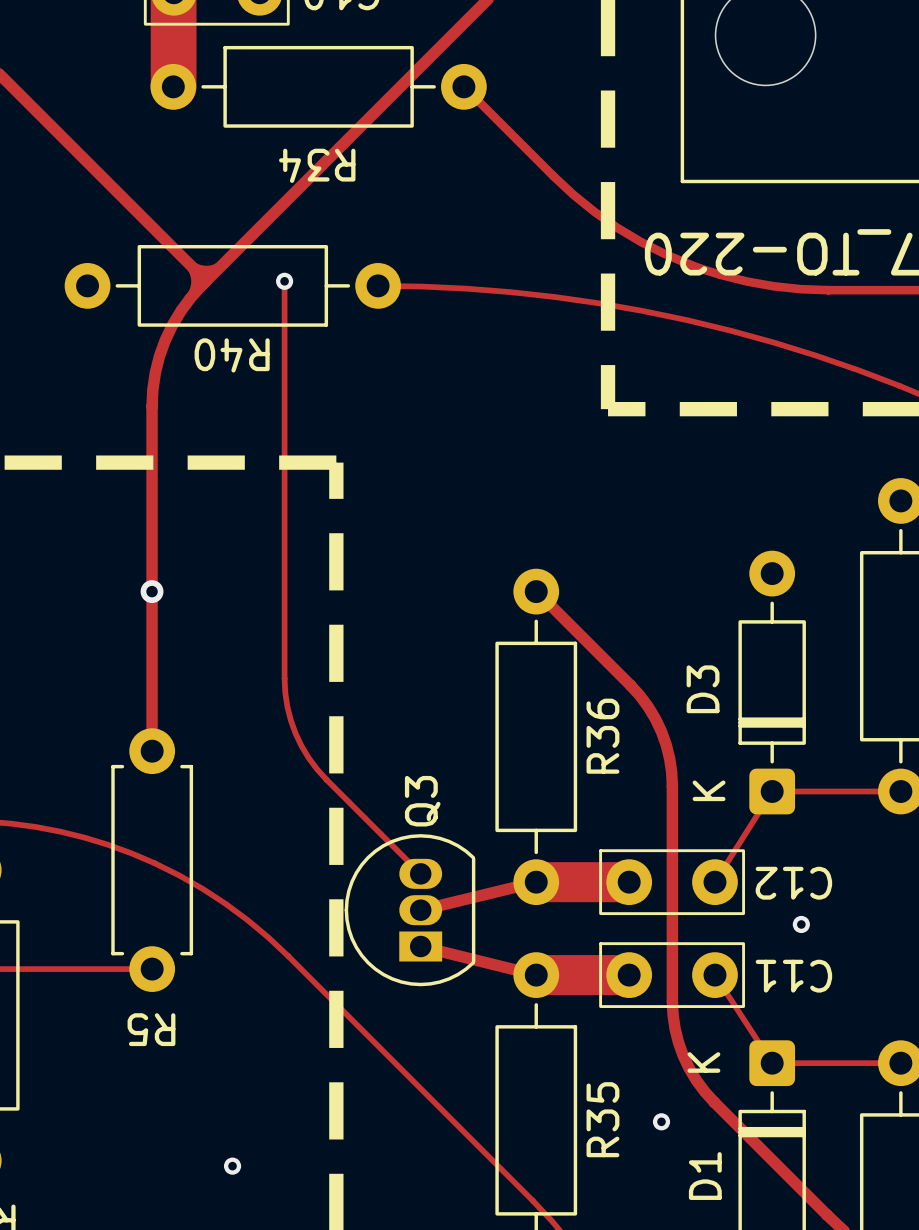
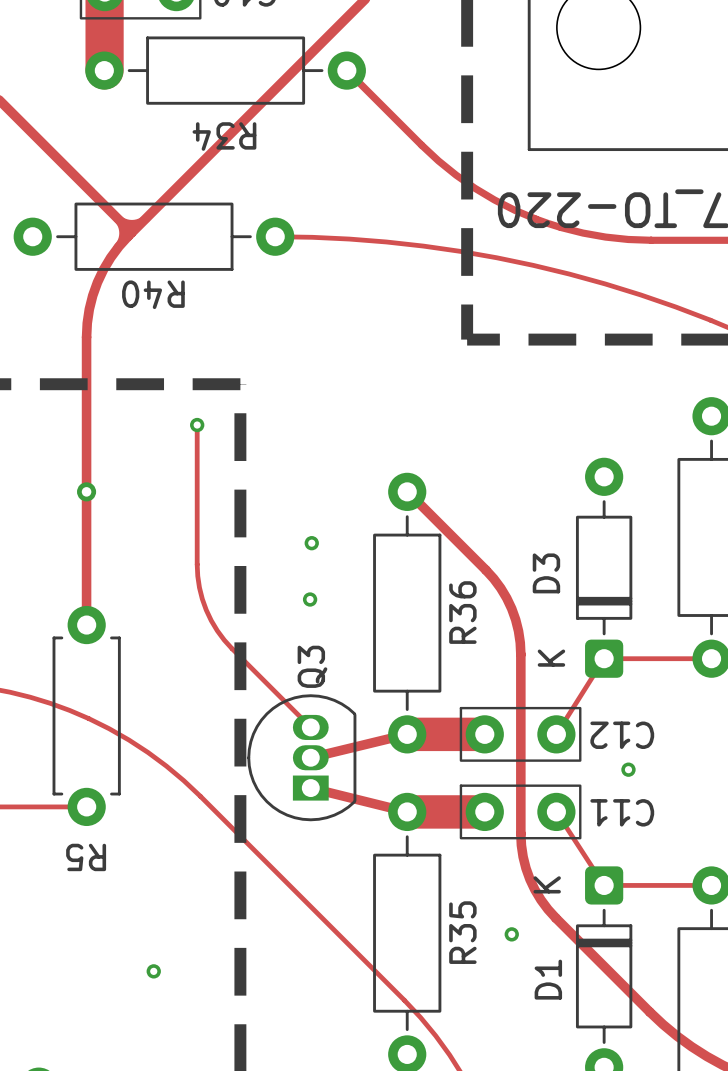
track: (284, 281) (284, 511) -> none
via: (284, 281) -> none
via: none -> (197, 425)
via: none -> (311, 543)
via: none -> (310, 599)

